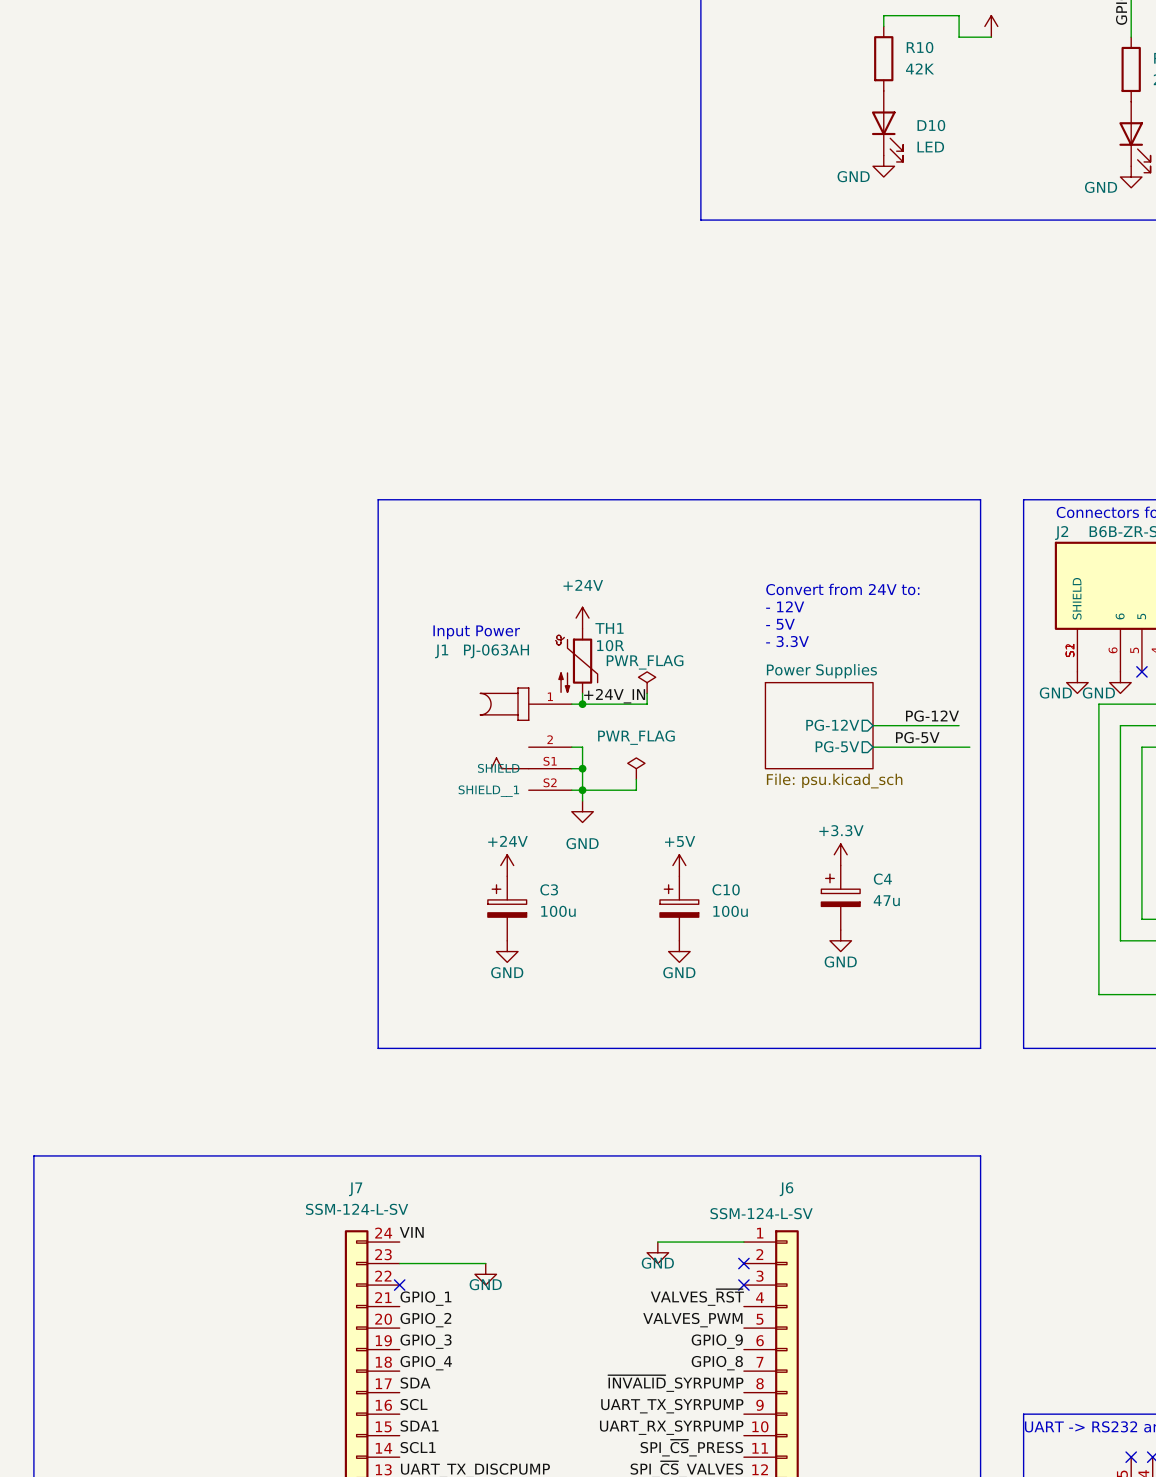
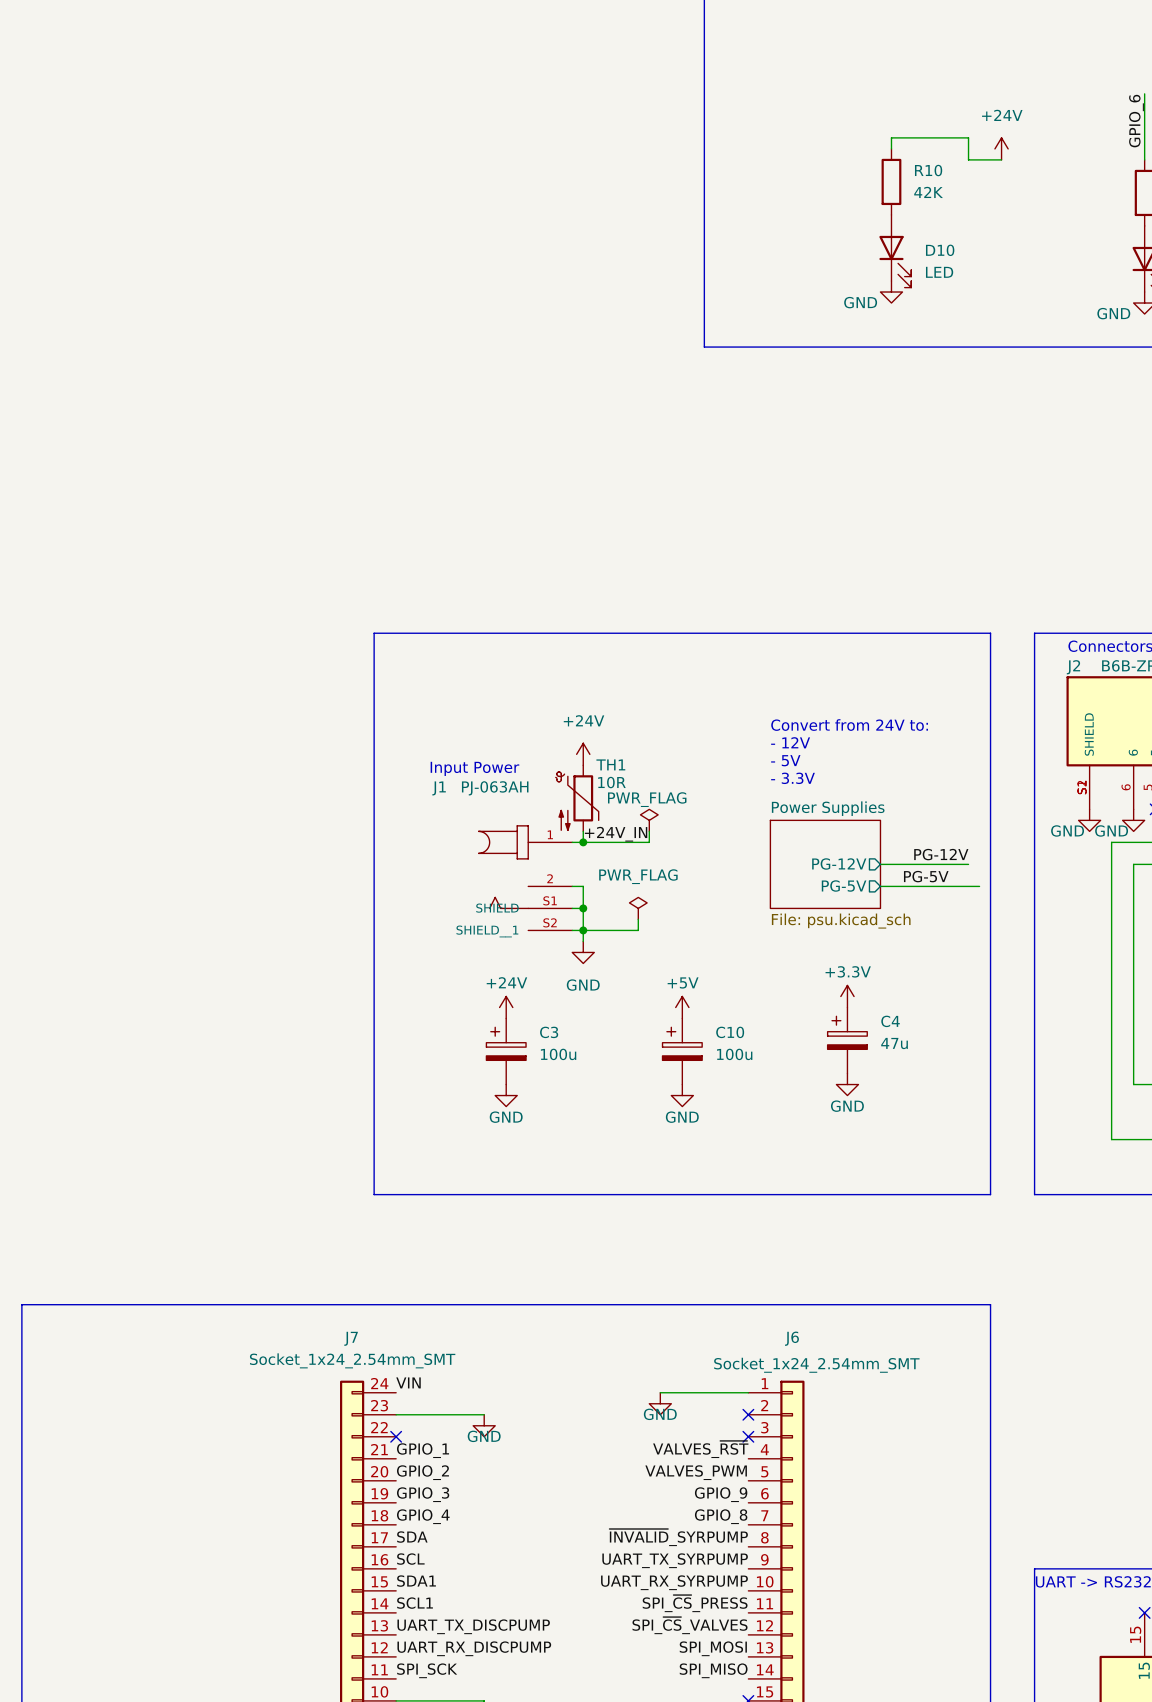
J7 value: SSM-124-L-SV (357, 1209) -> Socket_1x24_2.54mm_SMT (352, 1360)
J6 value: SSM-124-L-SV (761, 1213) -> Socket_1x24_2.54mm_SMT (816, 1365)

